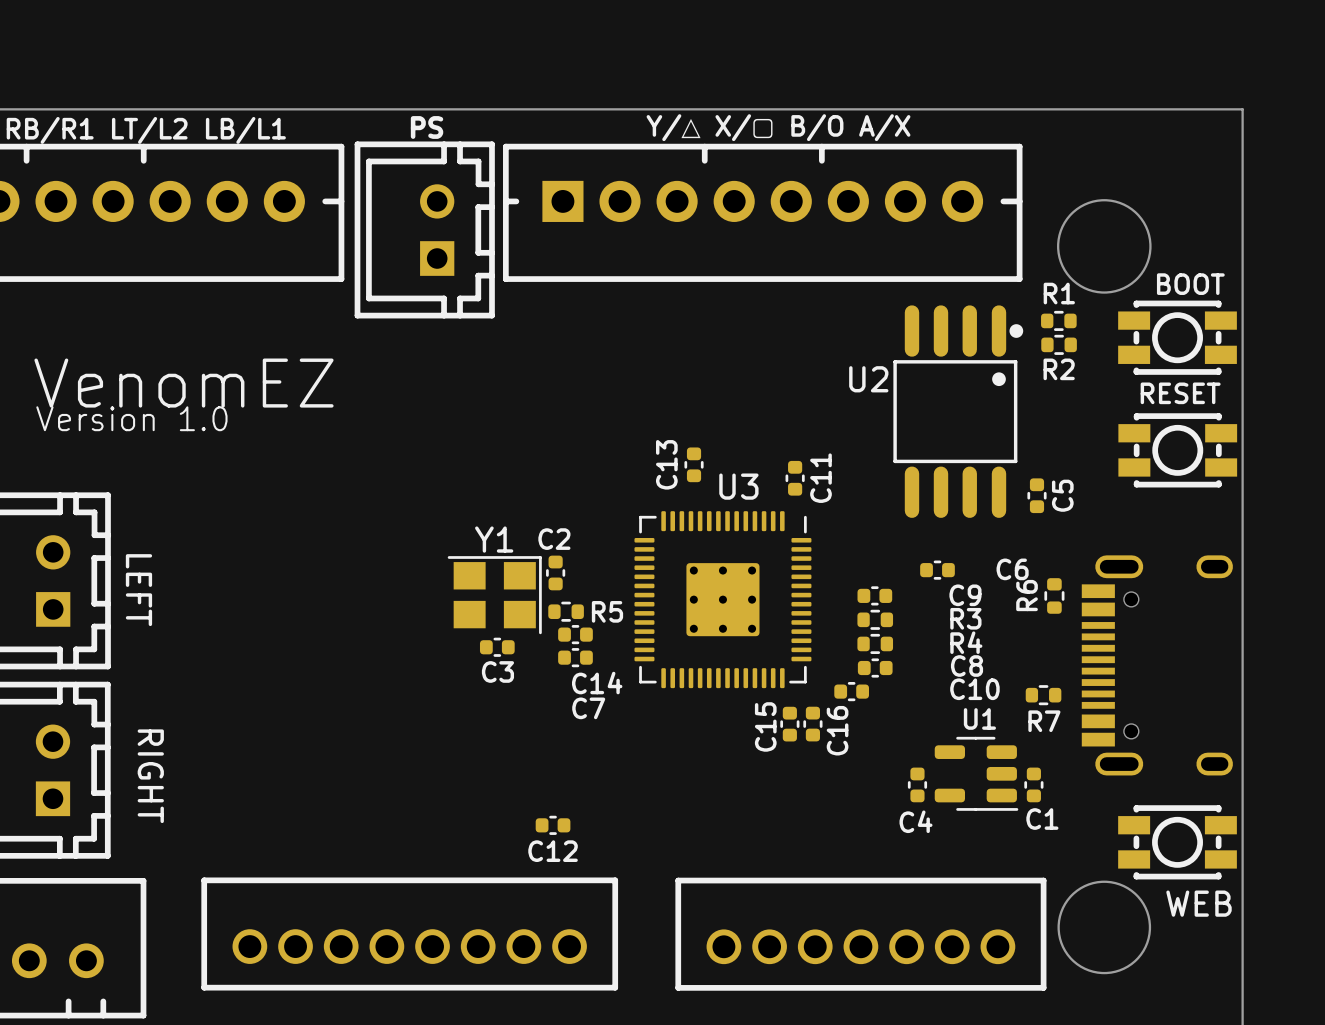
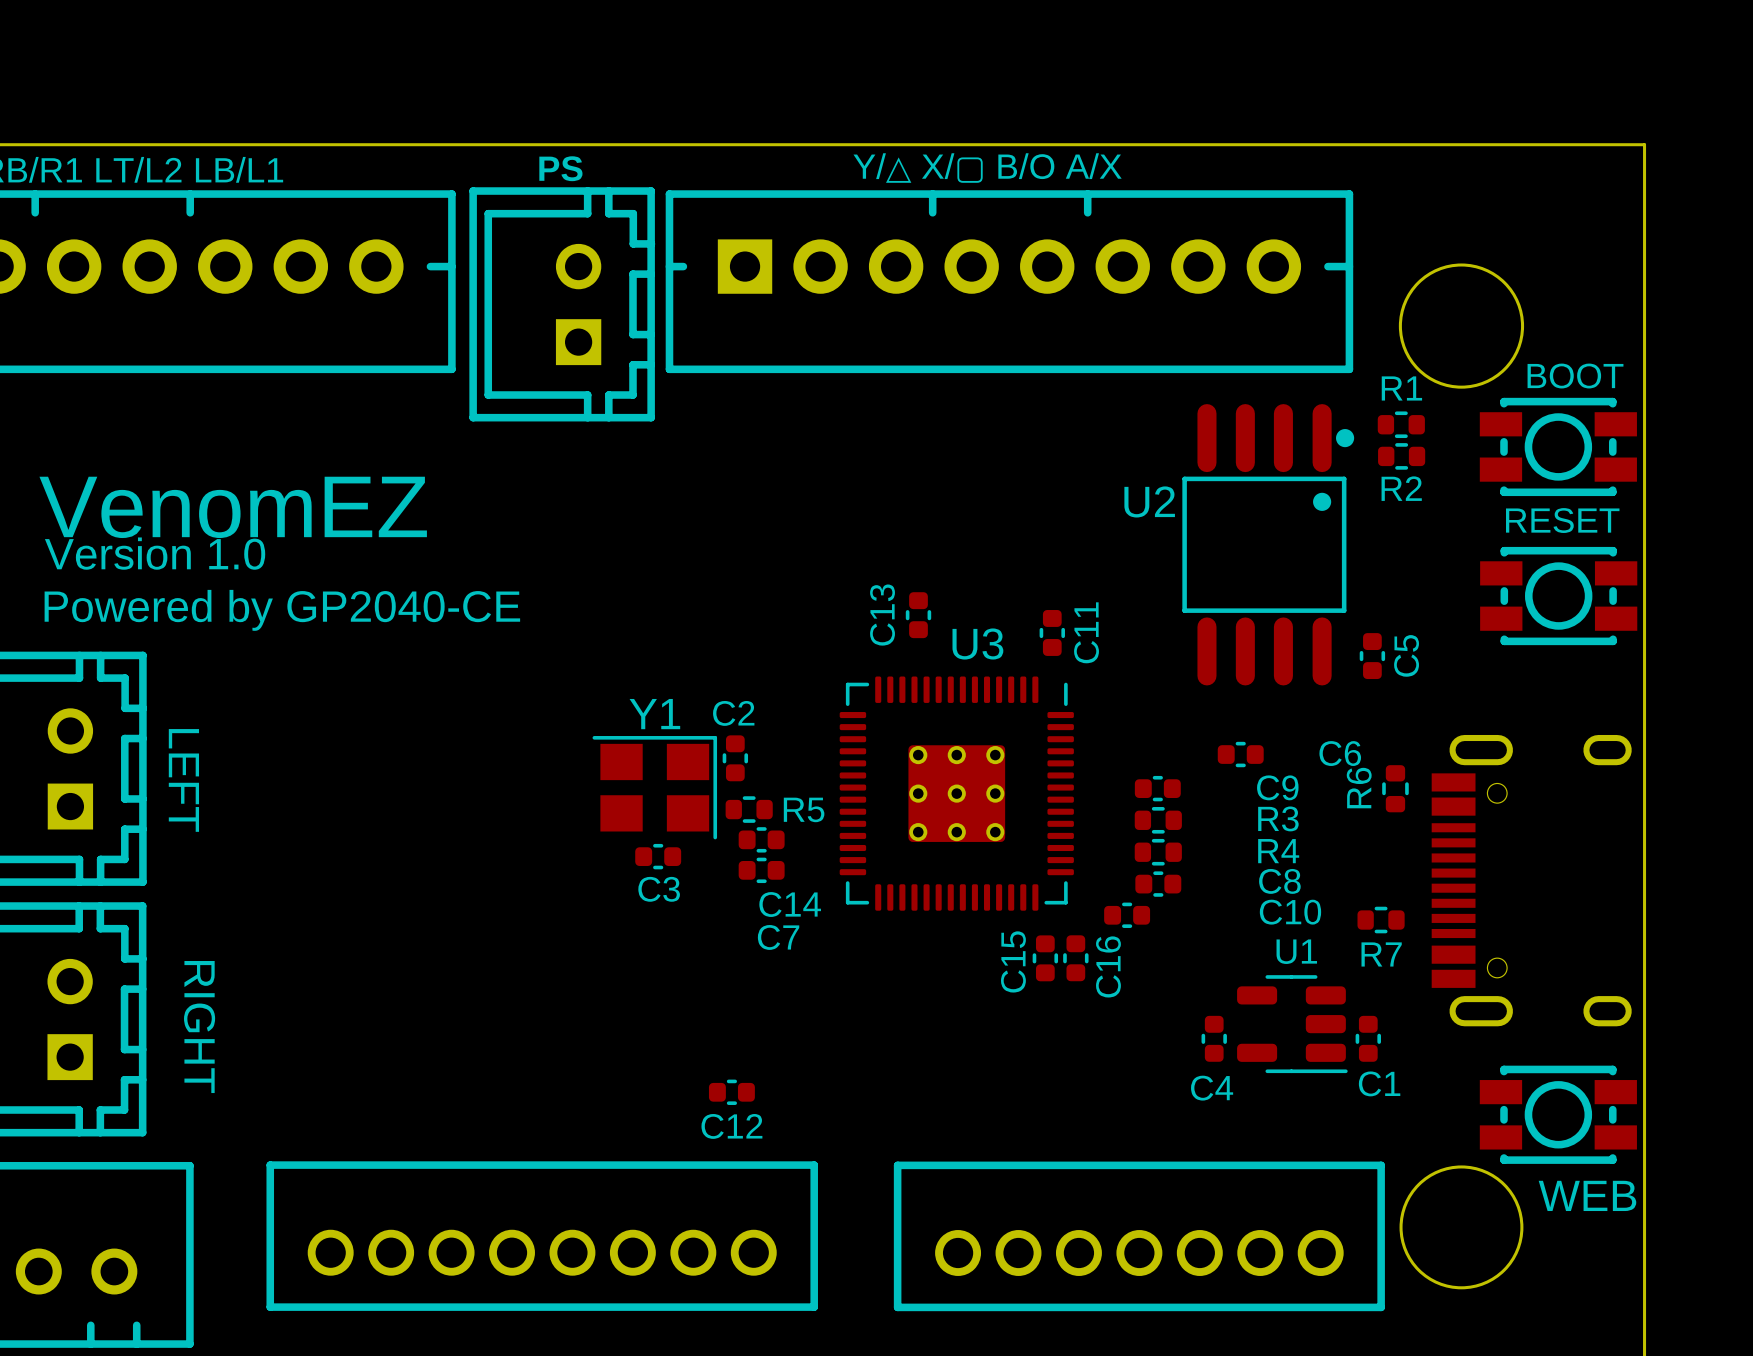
text: none -> Powered by GP2040-CE (282, 610)

